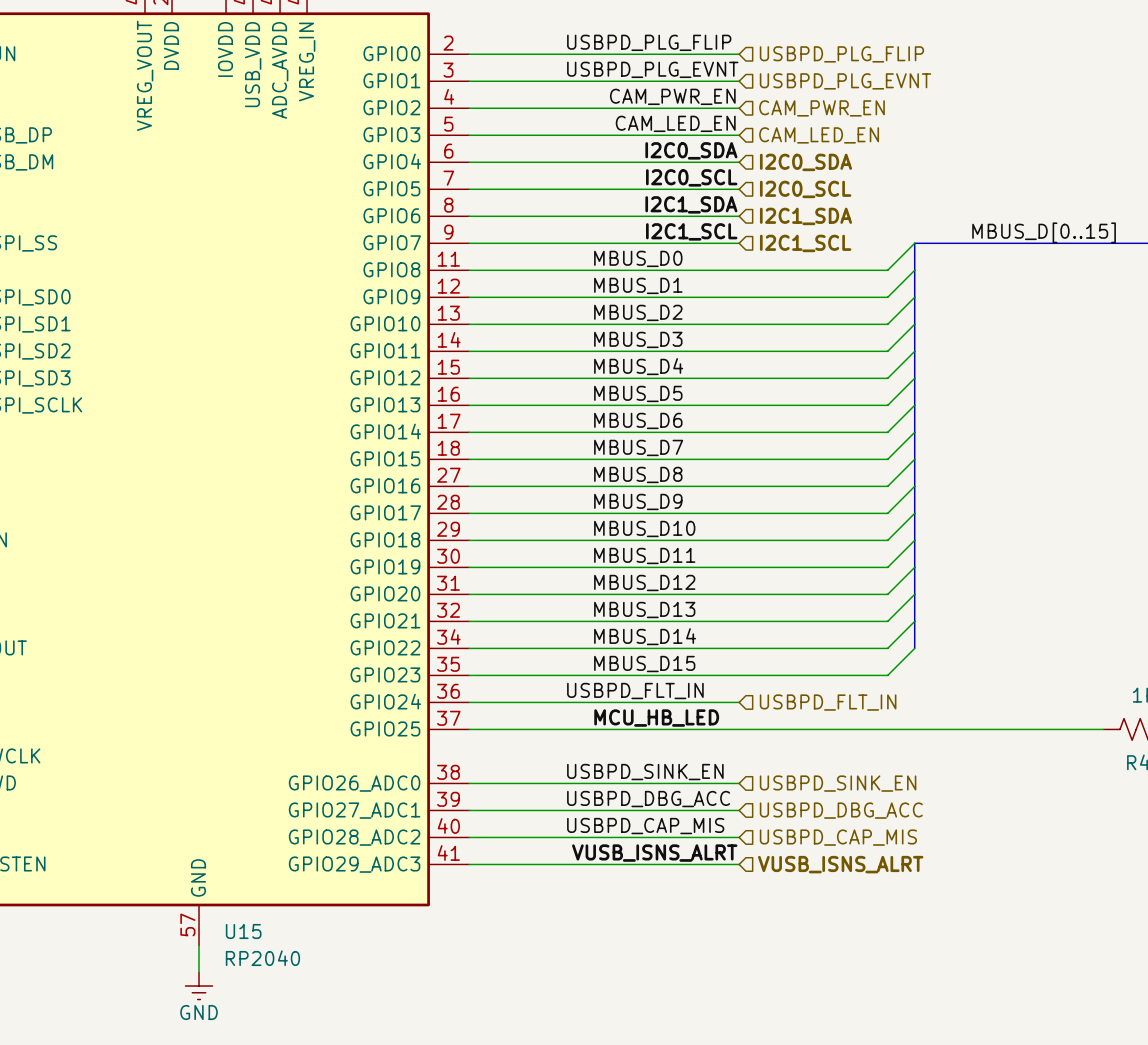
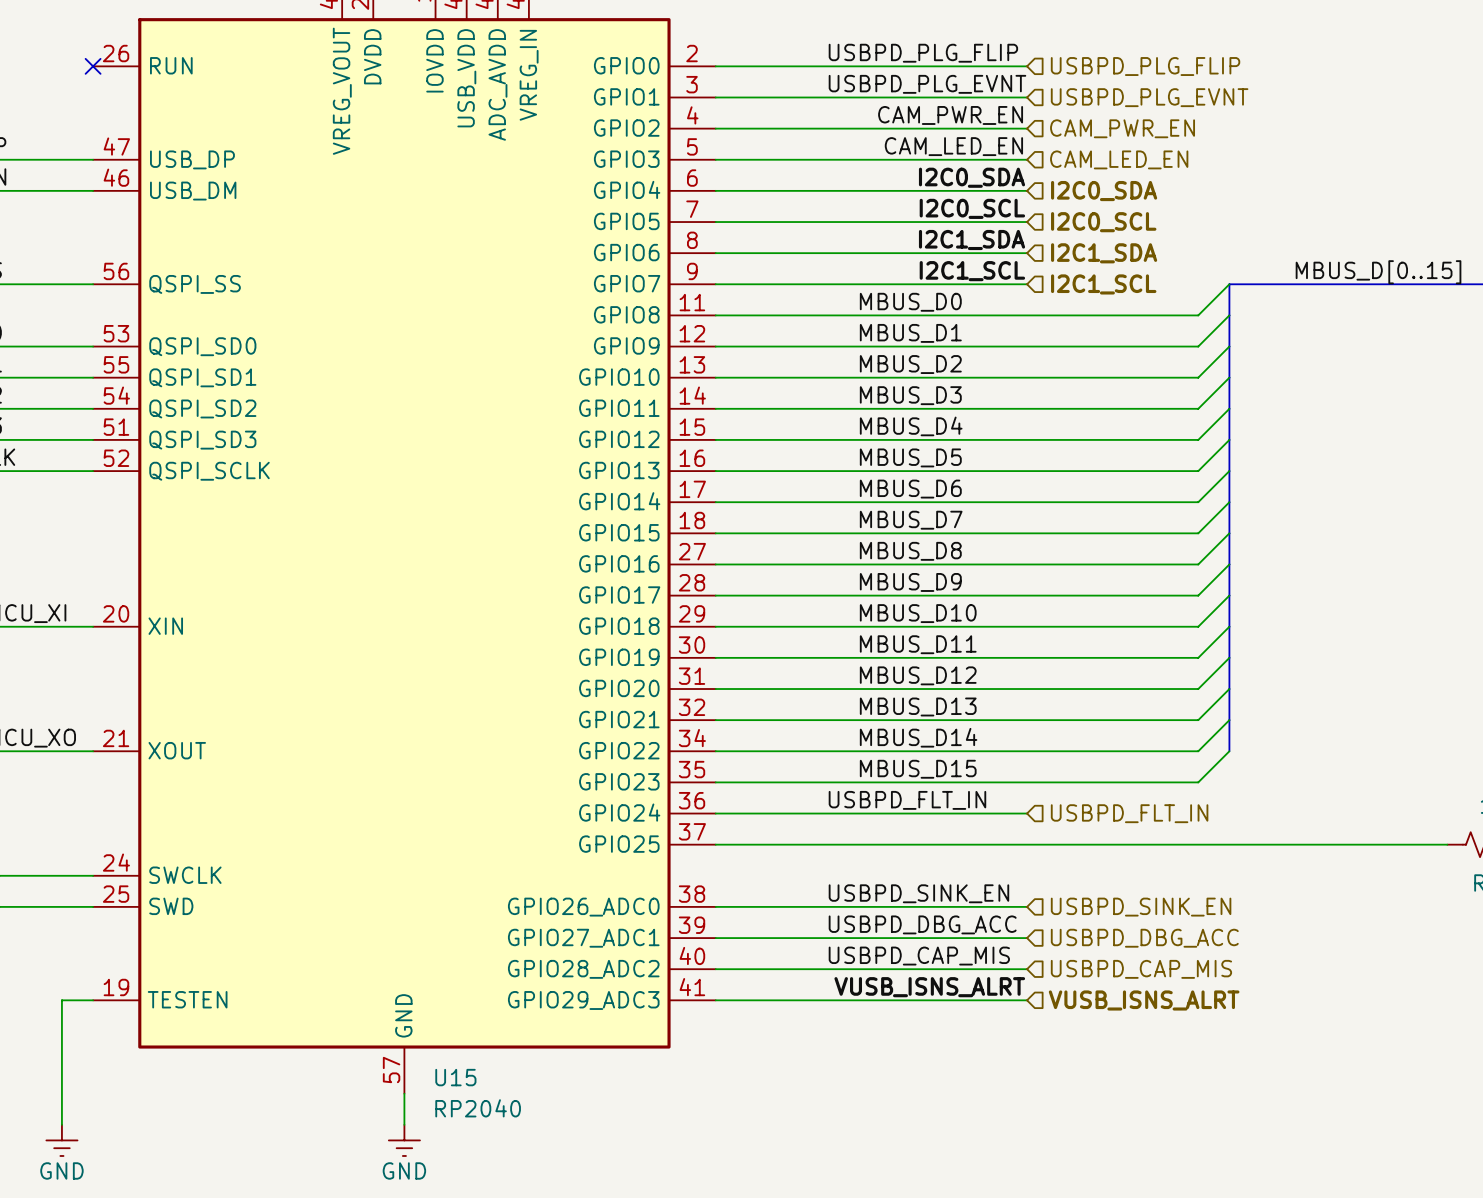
label: MCU_HB_LED (656, 718) -> none

